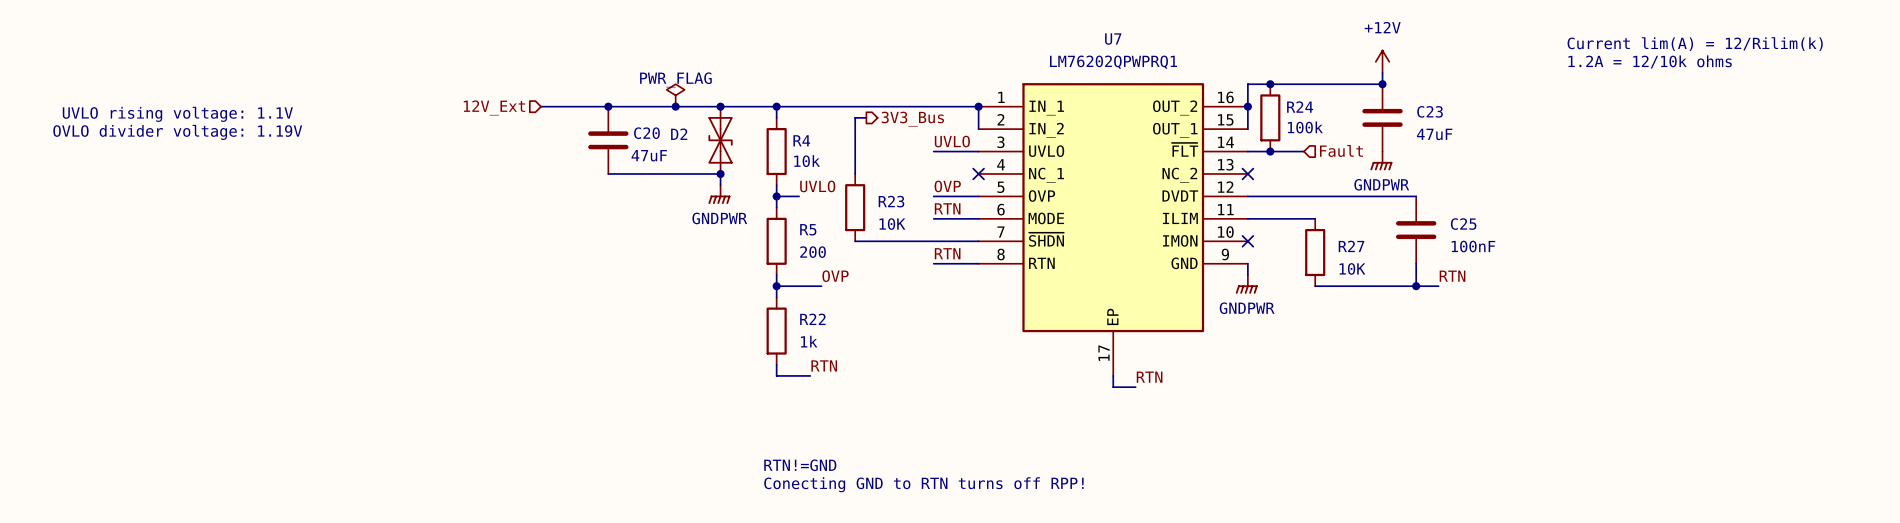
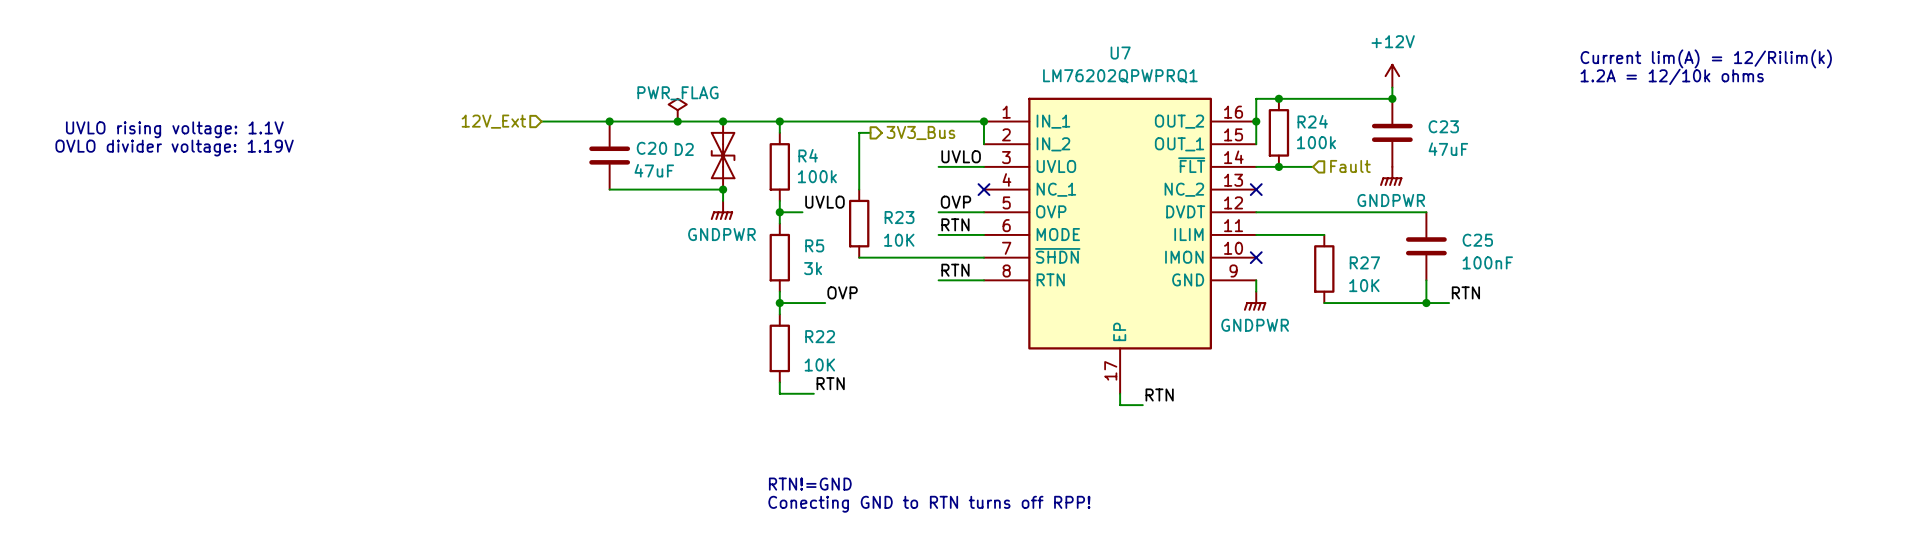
R4 value: 10k (807, 161) -> 100k (817, 176)
R5 value: 200 (813, 252) -> 3k (813, 268)
R22 value: 1k (809, 341) -> 10K (819, 364)

